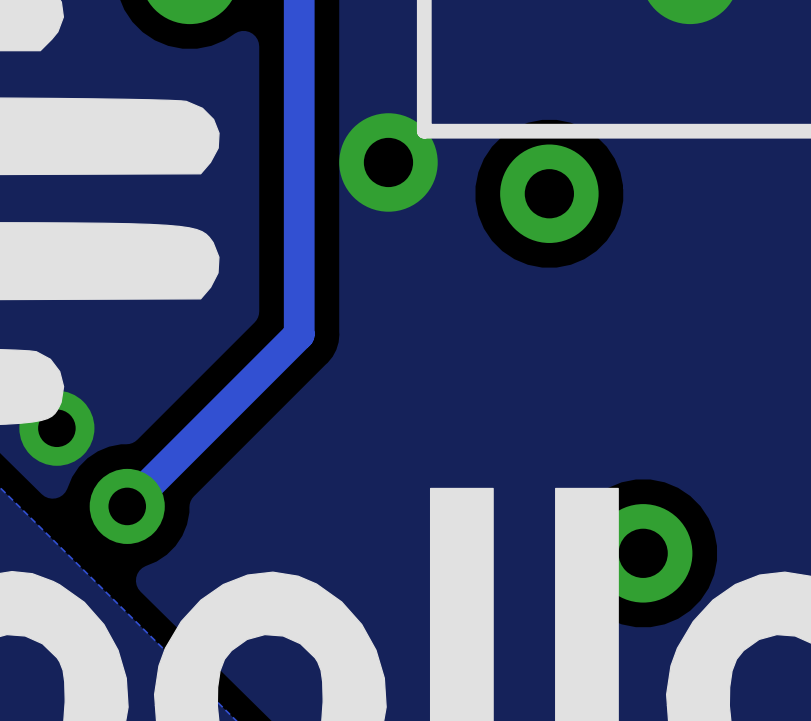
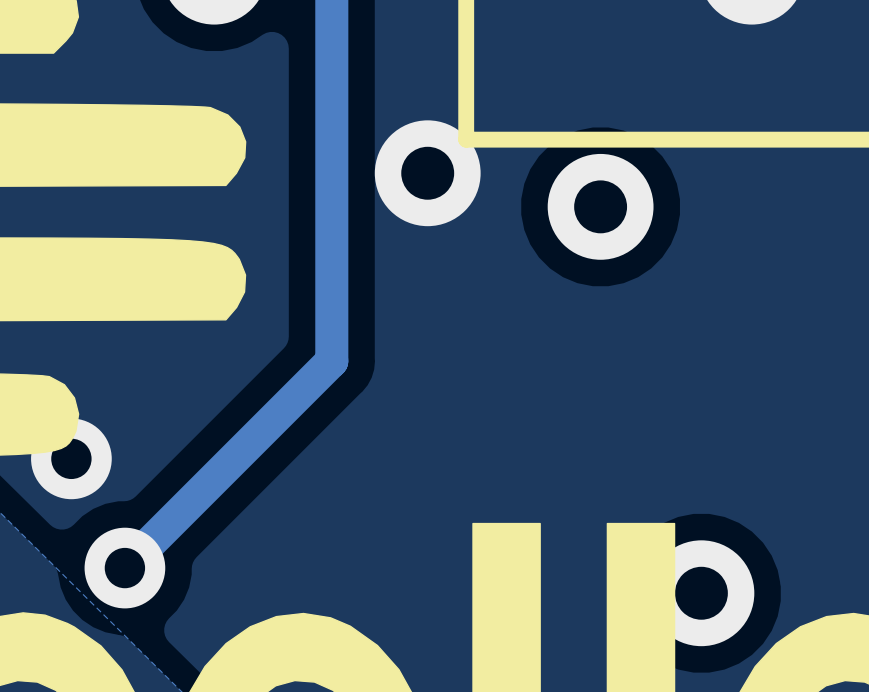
track: (299, 334) (127, 506) -> (331, 358) (331, 361) (124, 568)
via position: (127, 506) -> (124, 568)

